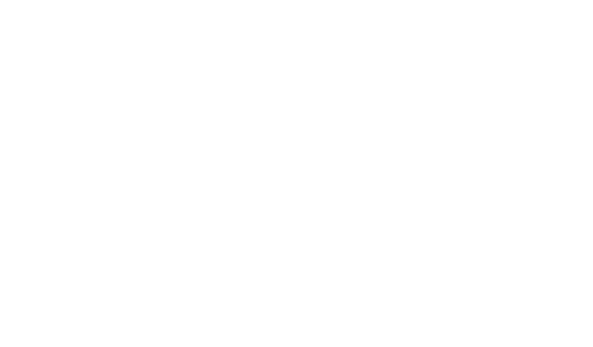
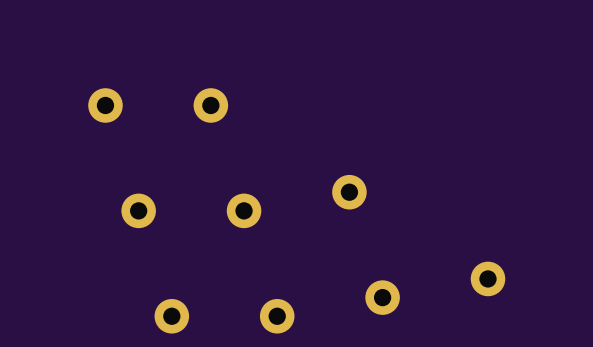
part: none -> (105, 105)
part: none -> (210, 105)
part: none -> (349, 192)
part: none -> (138, 210)
part: none -> (244, 210)
part: none -> (487, 278)
part: none -> (382, 297)
part: none -> (171, 316)
part: none -> (277, 316)

